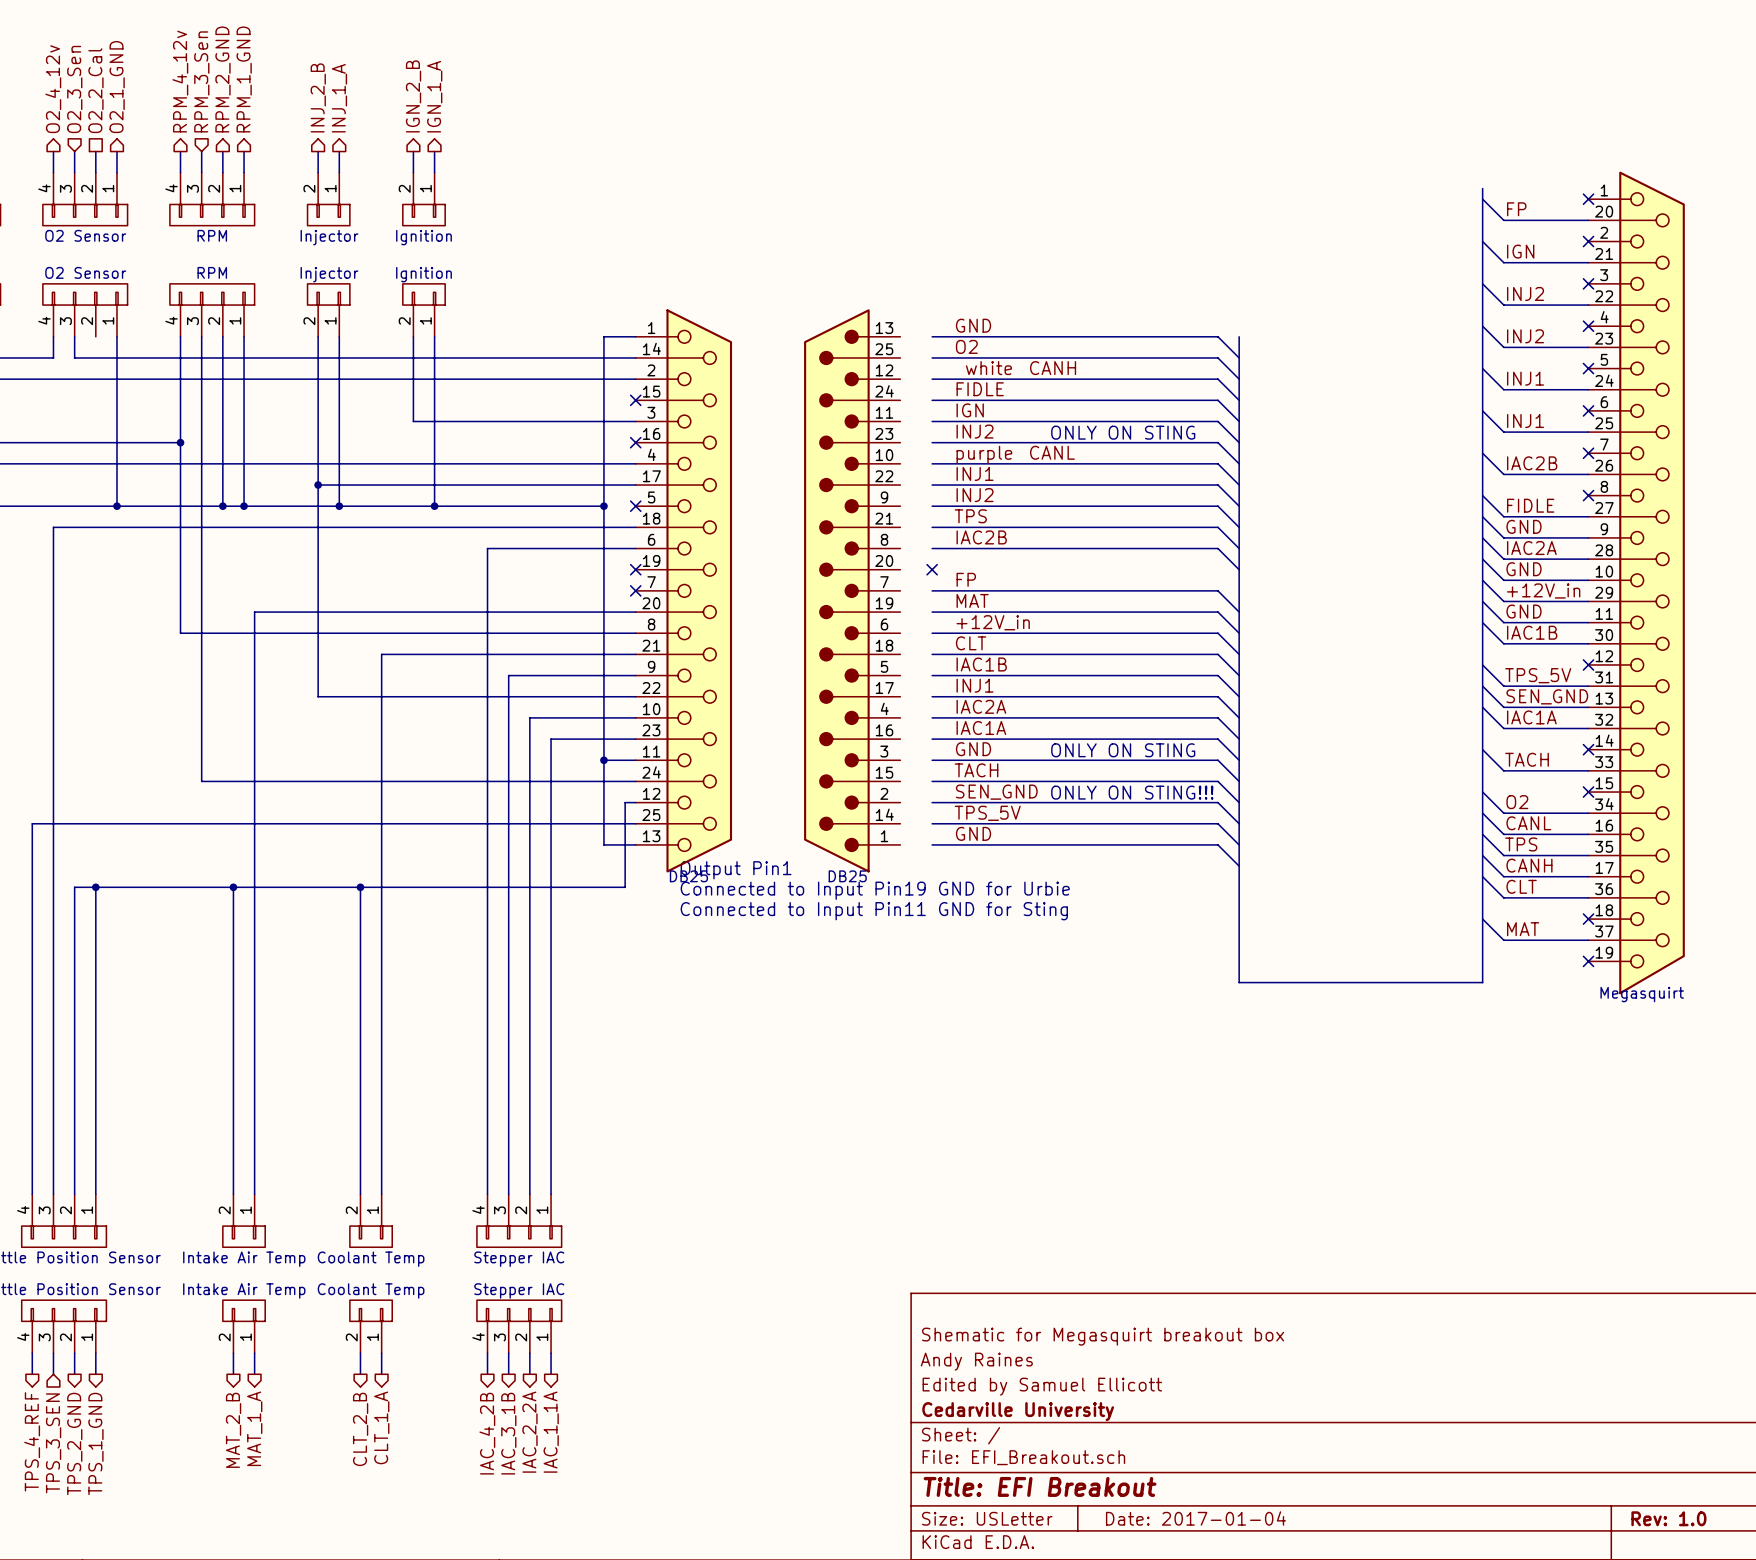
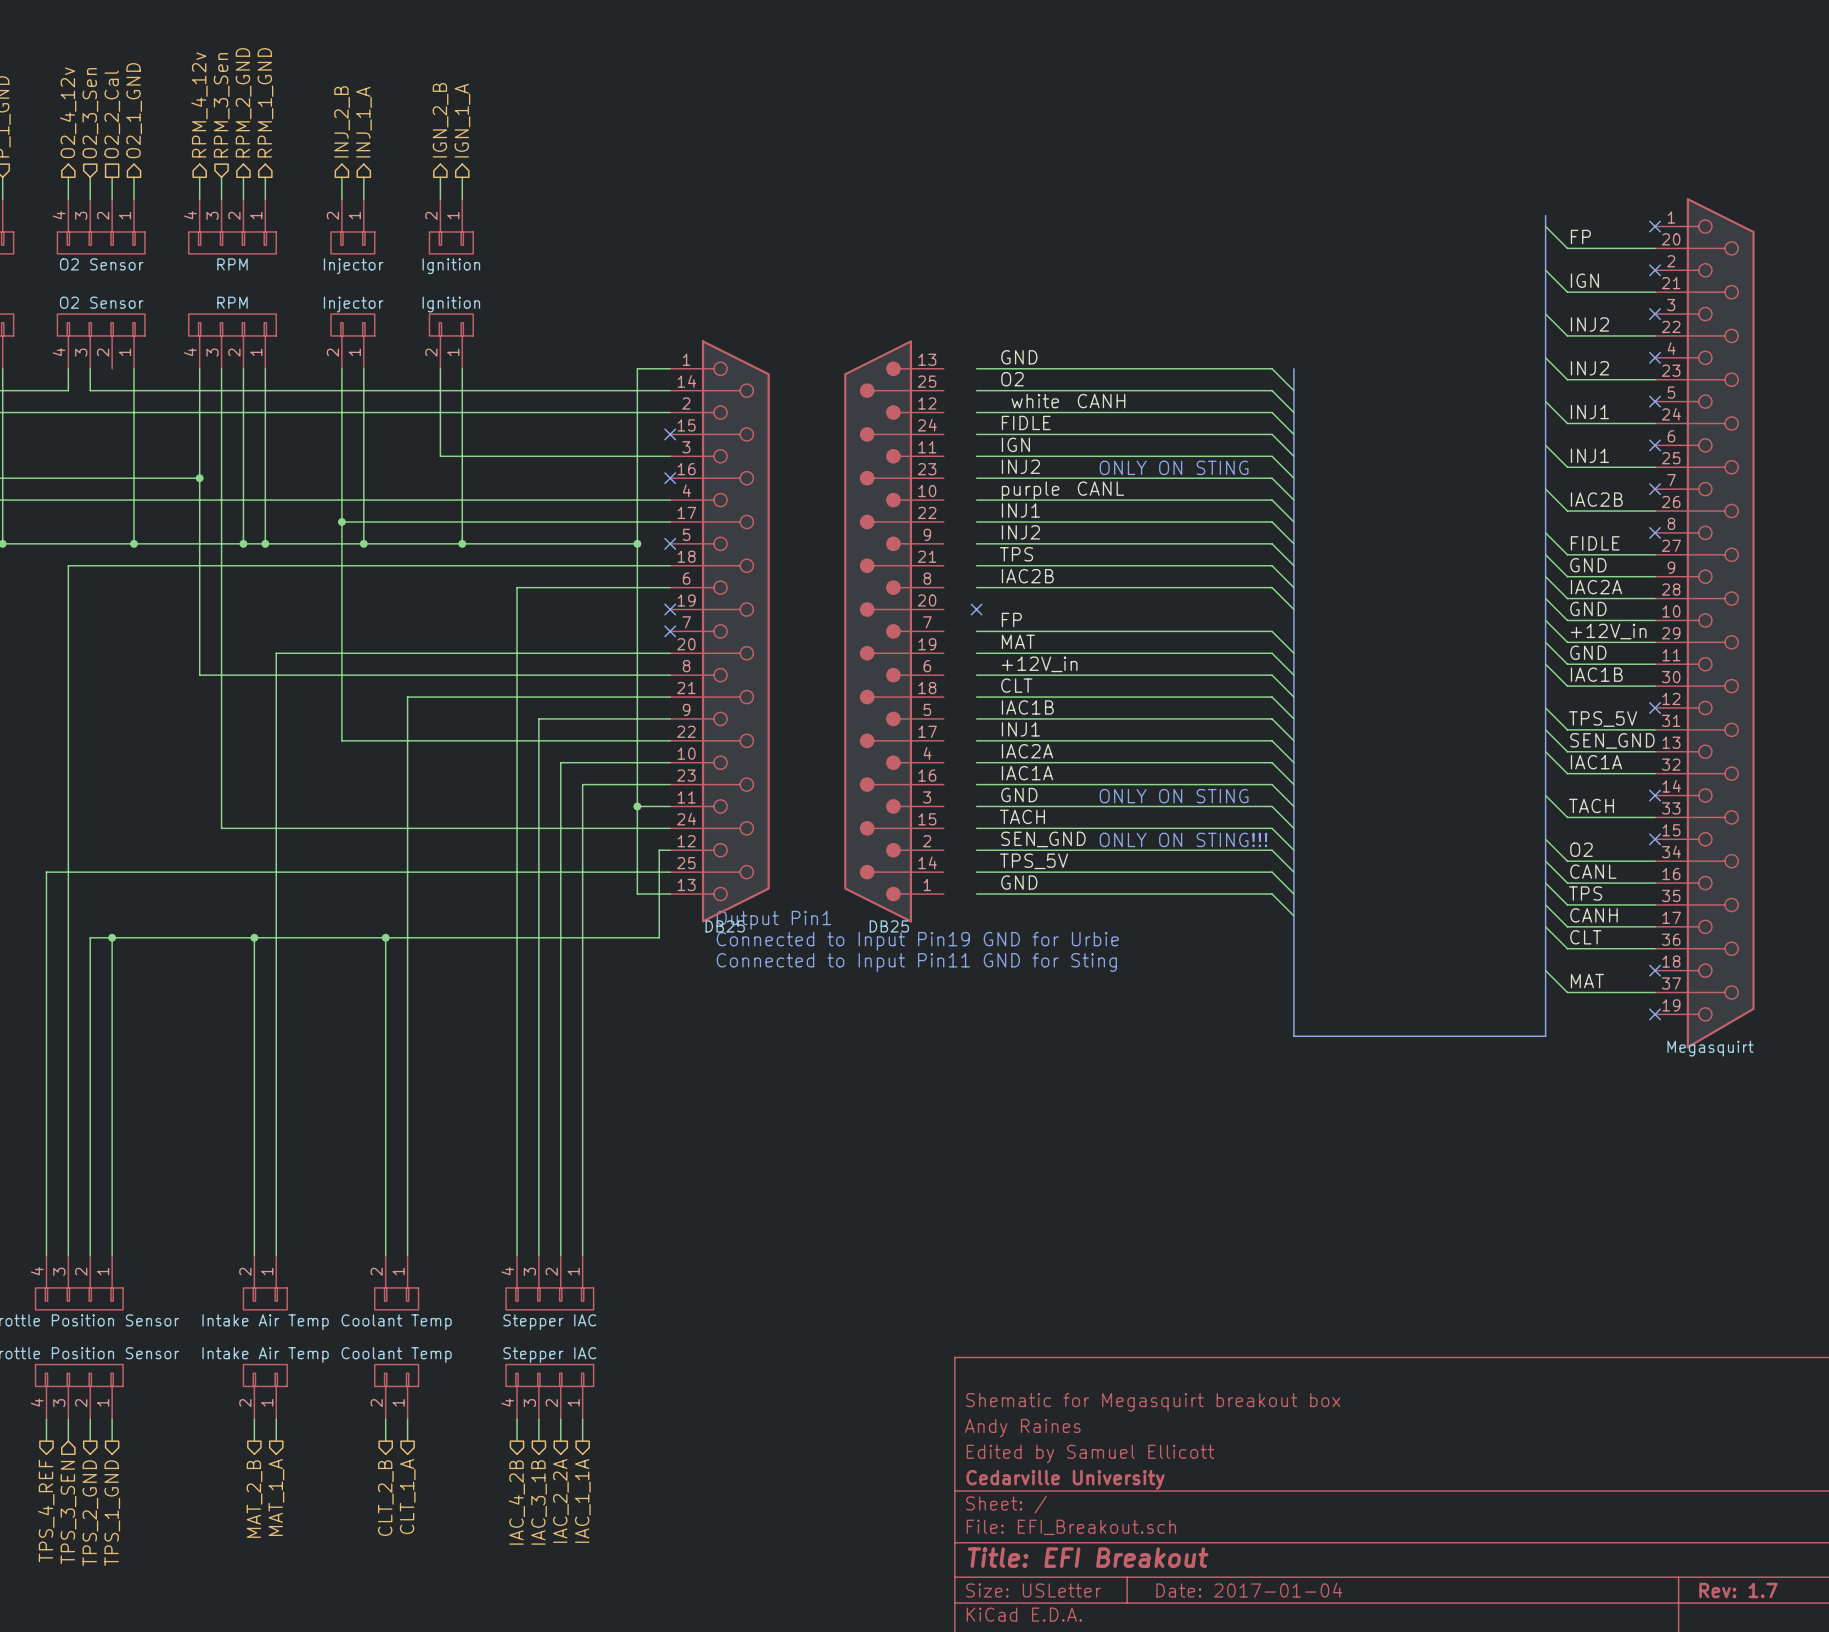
title block: Rev: 1.0 (1668, 1518) -> Rev: 1.7 (1738, 1590)

